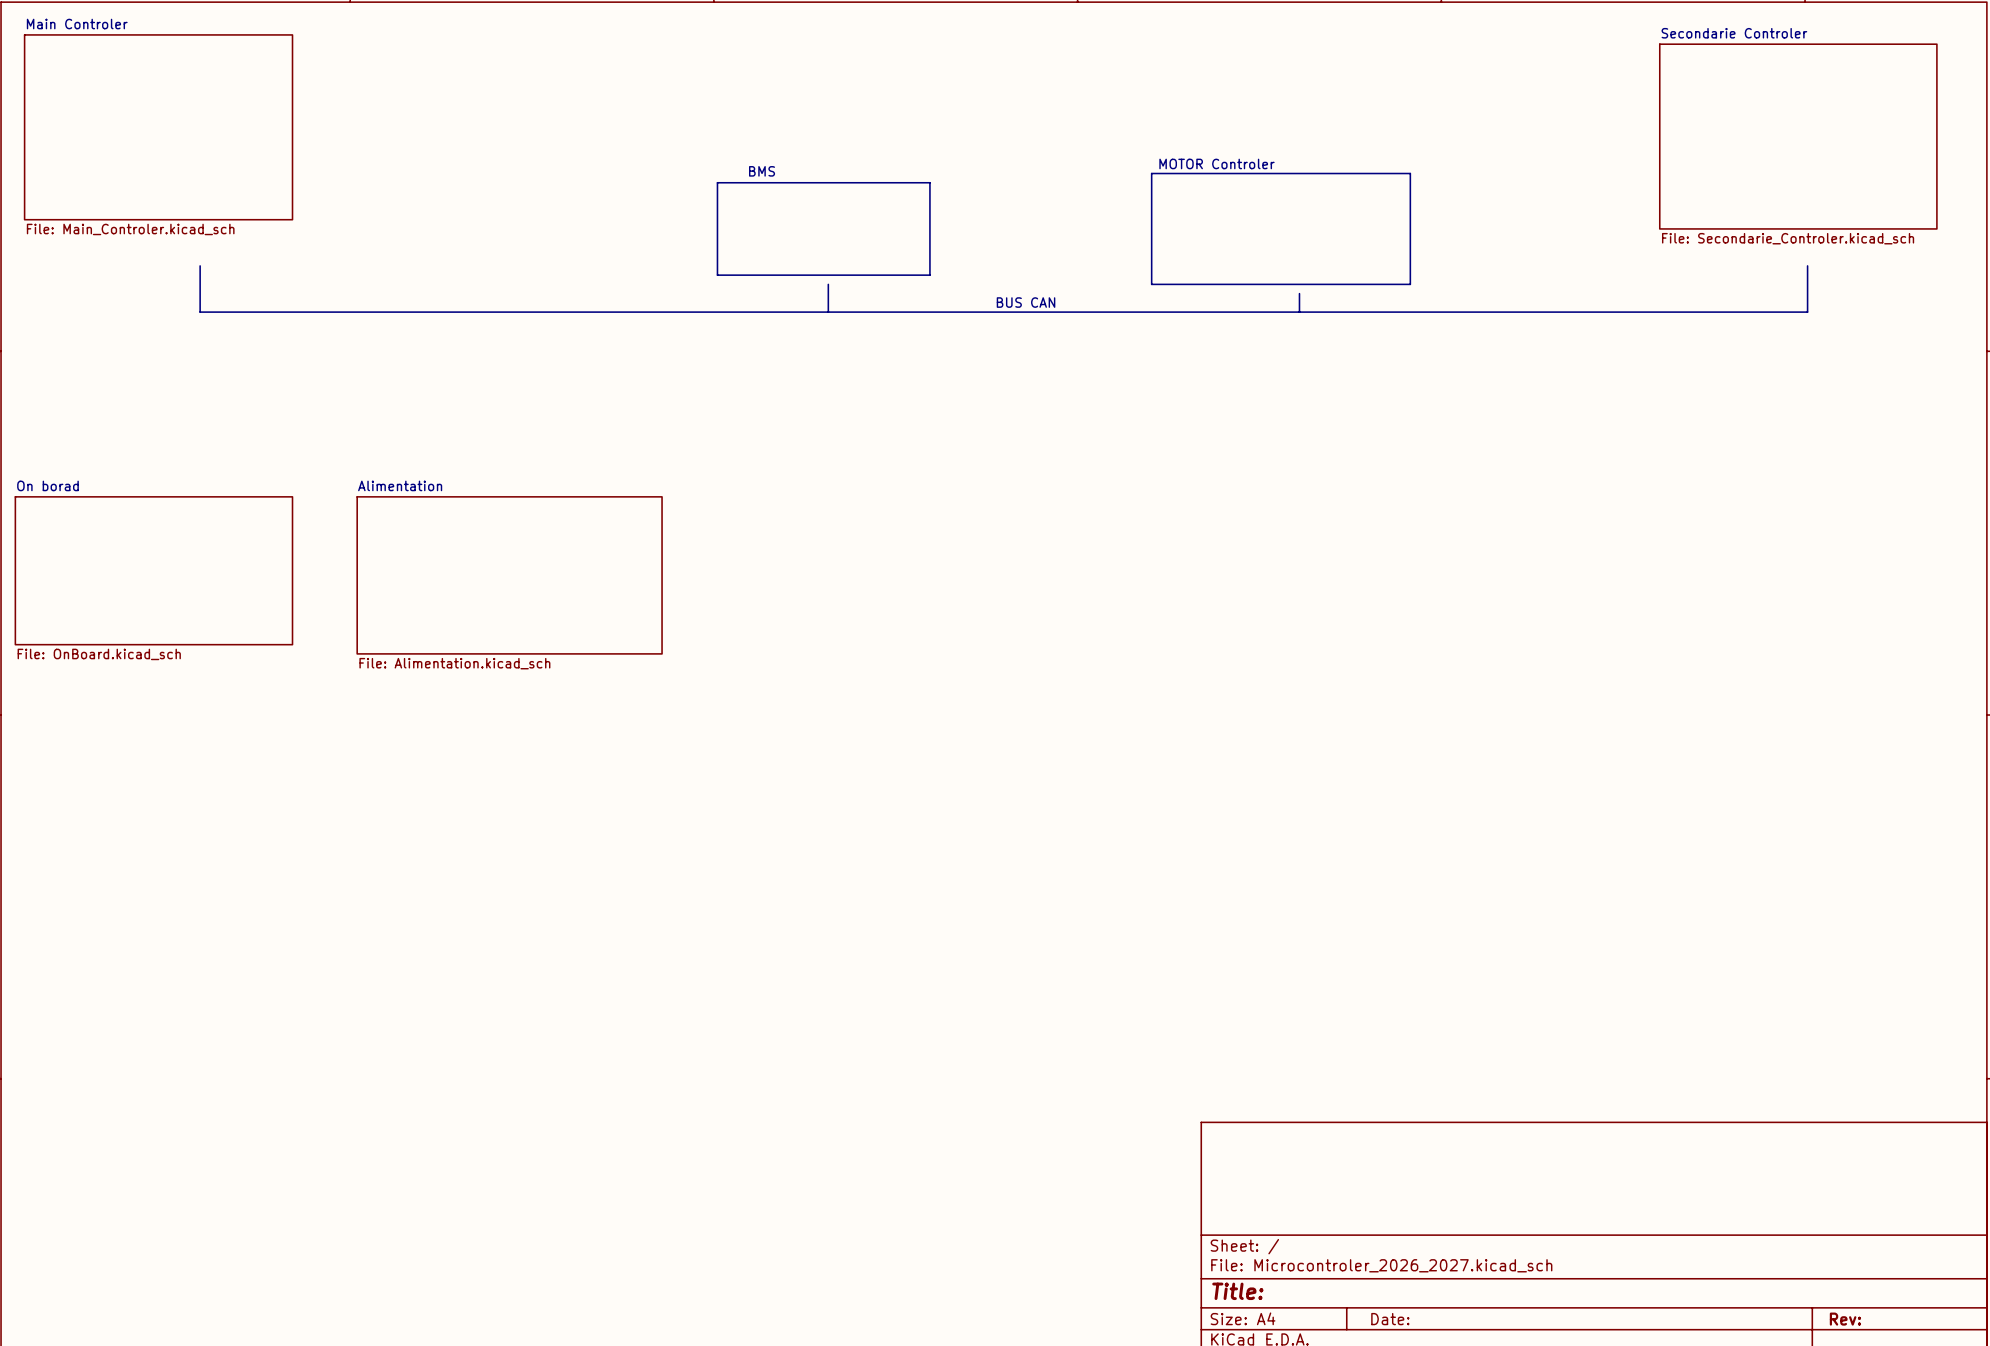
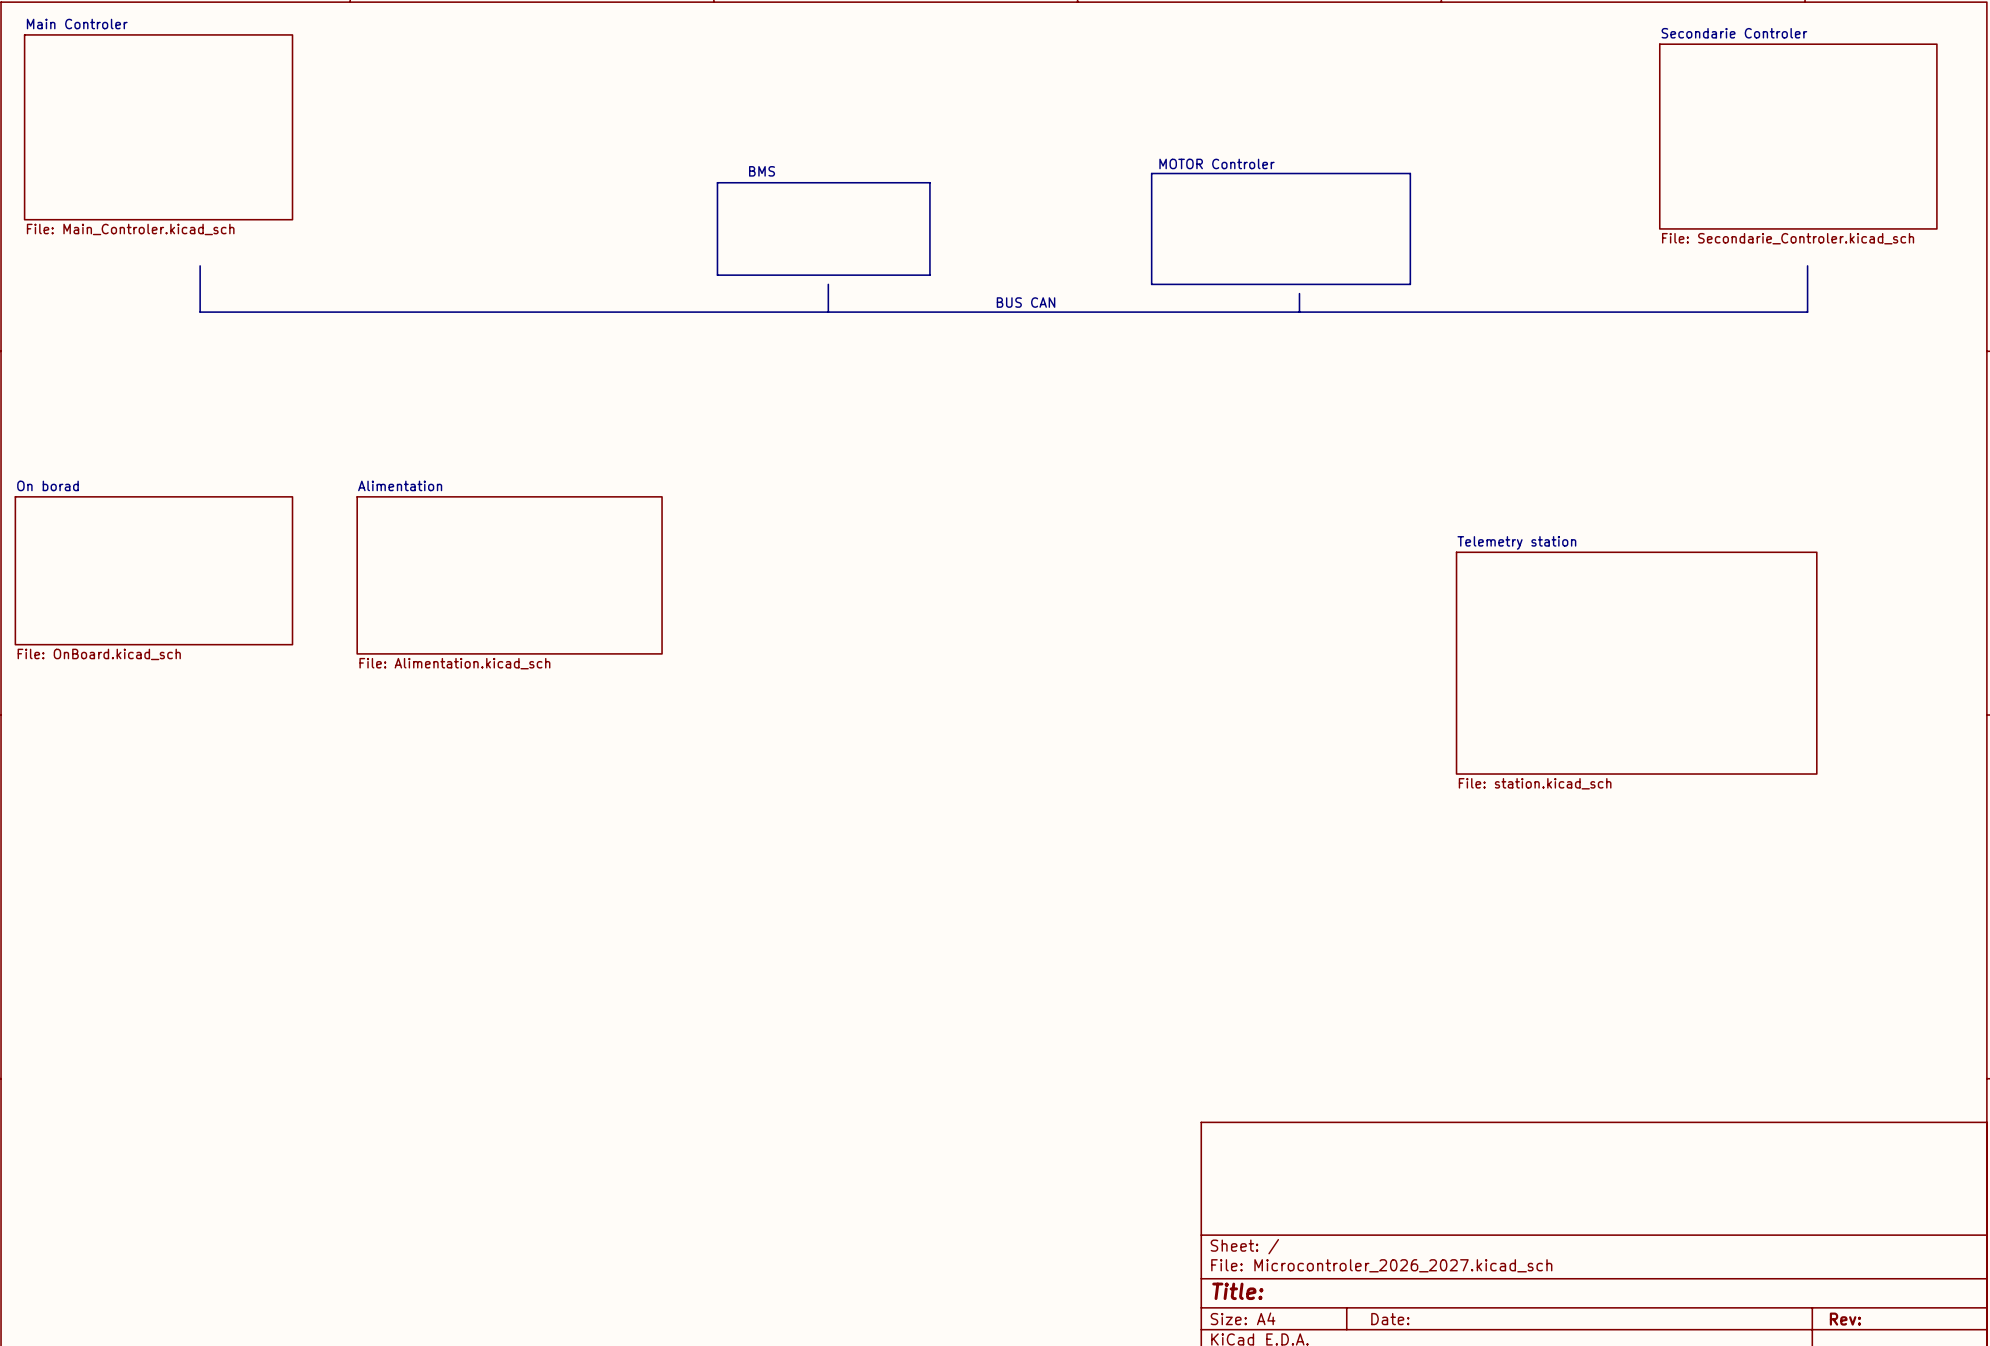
sheet Telemetry station: none -> File: station.kicad_sch (1636, 663)

